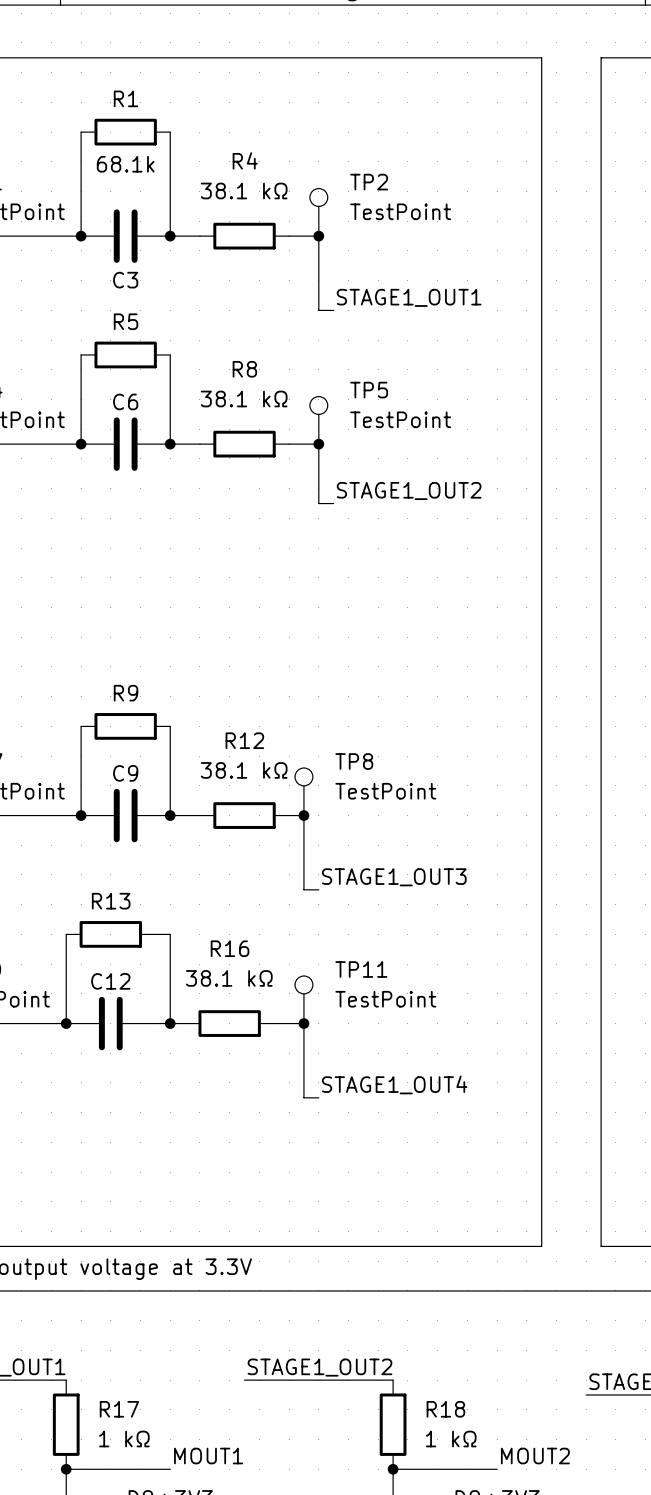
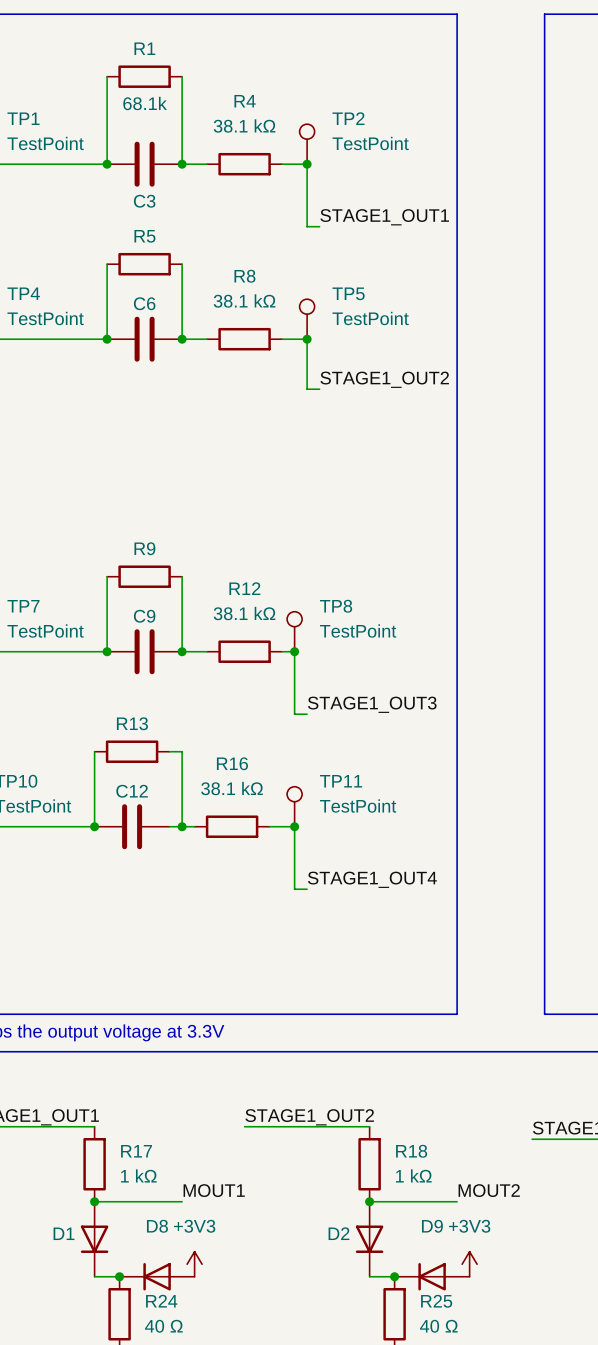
line: (497, 57) (541, 57) (541, 1246) (497, 1246) -> (457, 14) (457, 1014)

